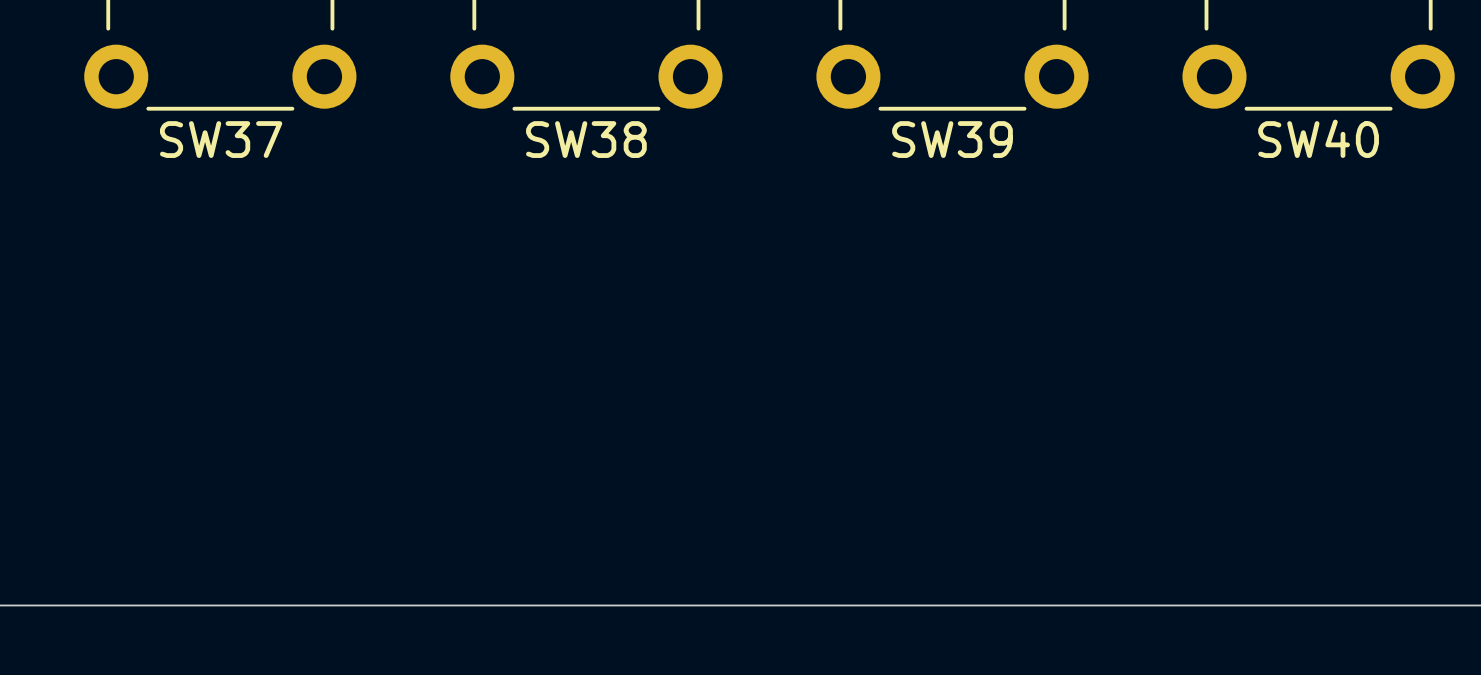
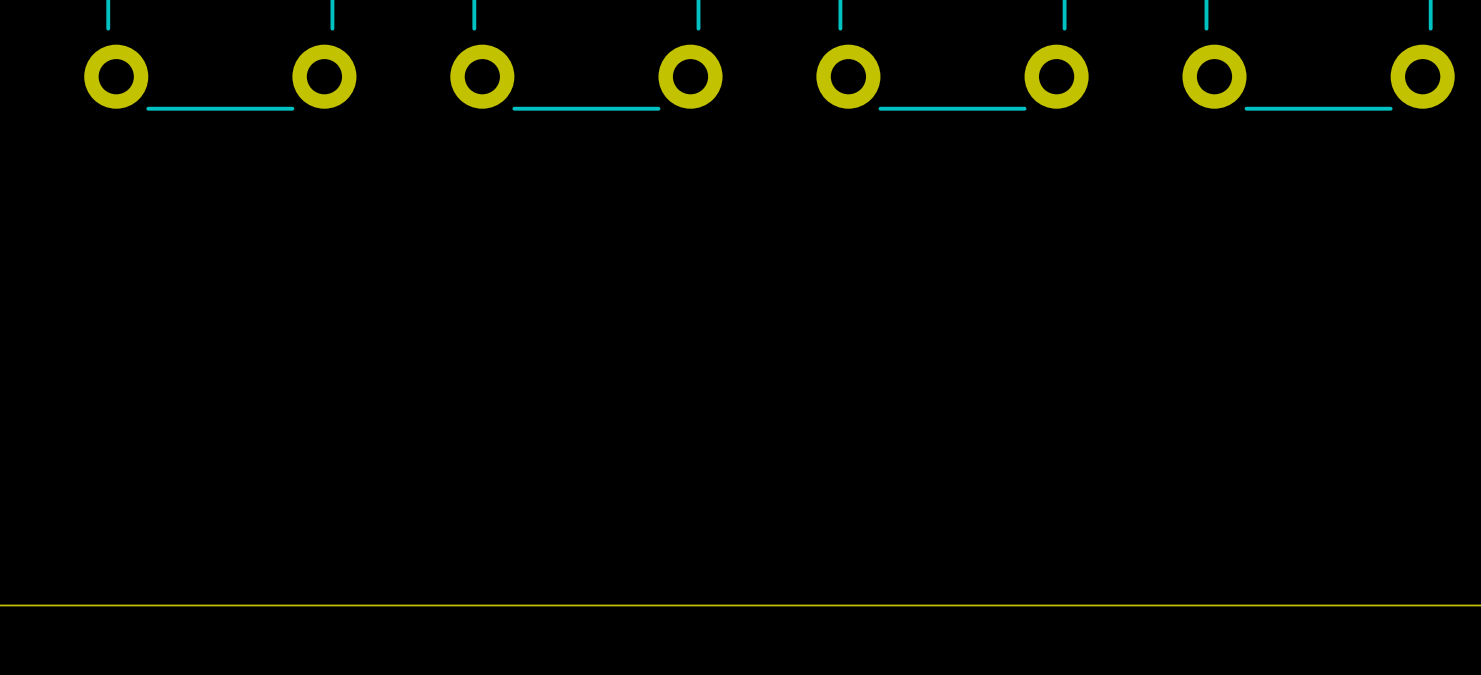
SW40 name: SW40 (1318, 138) -> none
SW37 name: SW37 (221, 139) -> none
SW38 name: SW38 (586, 139) -> none
SW39 name: SW39 (952, 139) -> none

